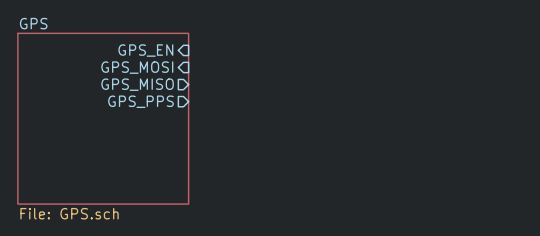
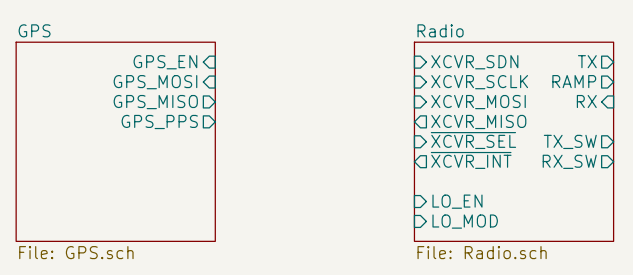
sheet pin: none -> XCVR_SDN (474, 62)
sheet pin: none -> TX (587, 61)
sheet pin: none -> XCVR_SCLK (479, 82)
sheet pin: none -> RAMP (574, 81)
sheet pin: none -> XCVR_MOSI (478, 102)
sheet pin: none -> RX (586, 101)
sheet pin: none -> XCVR_MISO (478, 121)
sheet pin: none -> ~{XCVR_SEL} (473, 140)
sheet Radio: none -> File: Radio.sch (514, 141)
sheet pin: none -> TX_SW (570, 141)
sheet pin: none -> ~{XCVR_INT} (471, 160)
sheet pin: none -> RX_SW (569, 161)
sheet pin: none -> LO_EN (457, 201)
sheet pin: none -> LO_MOD (465, 221)

